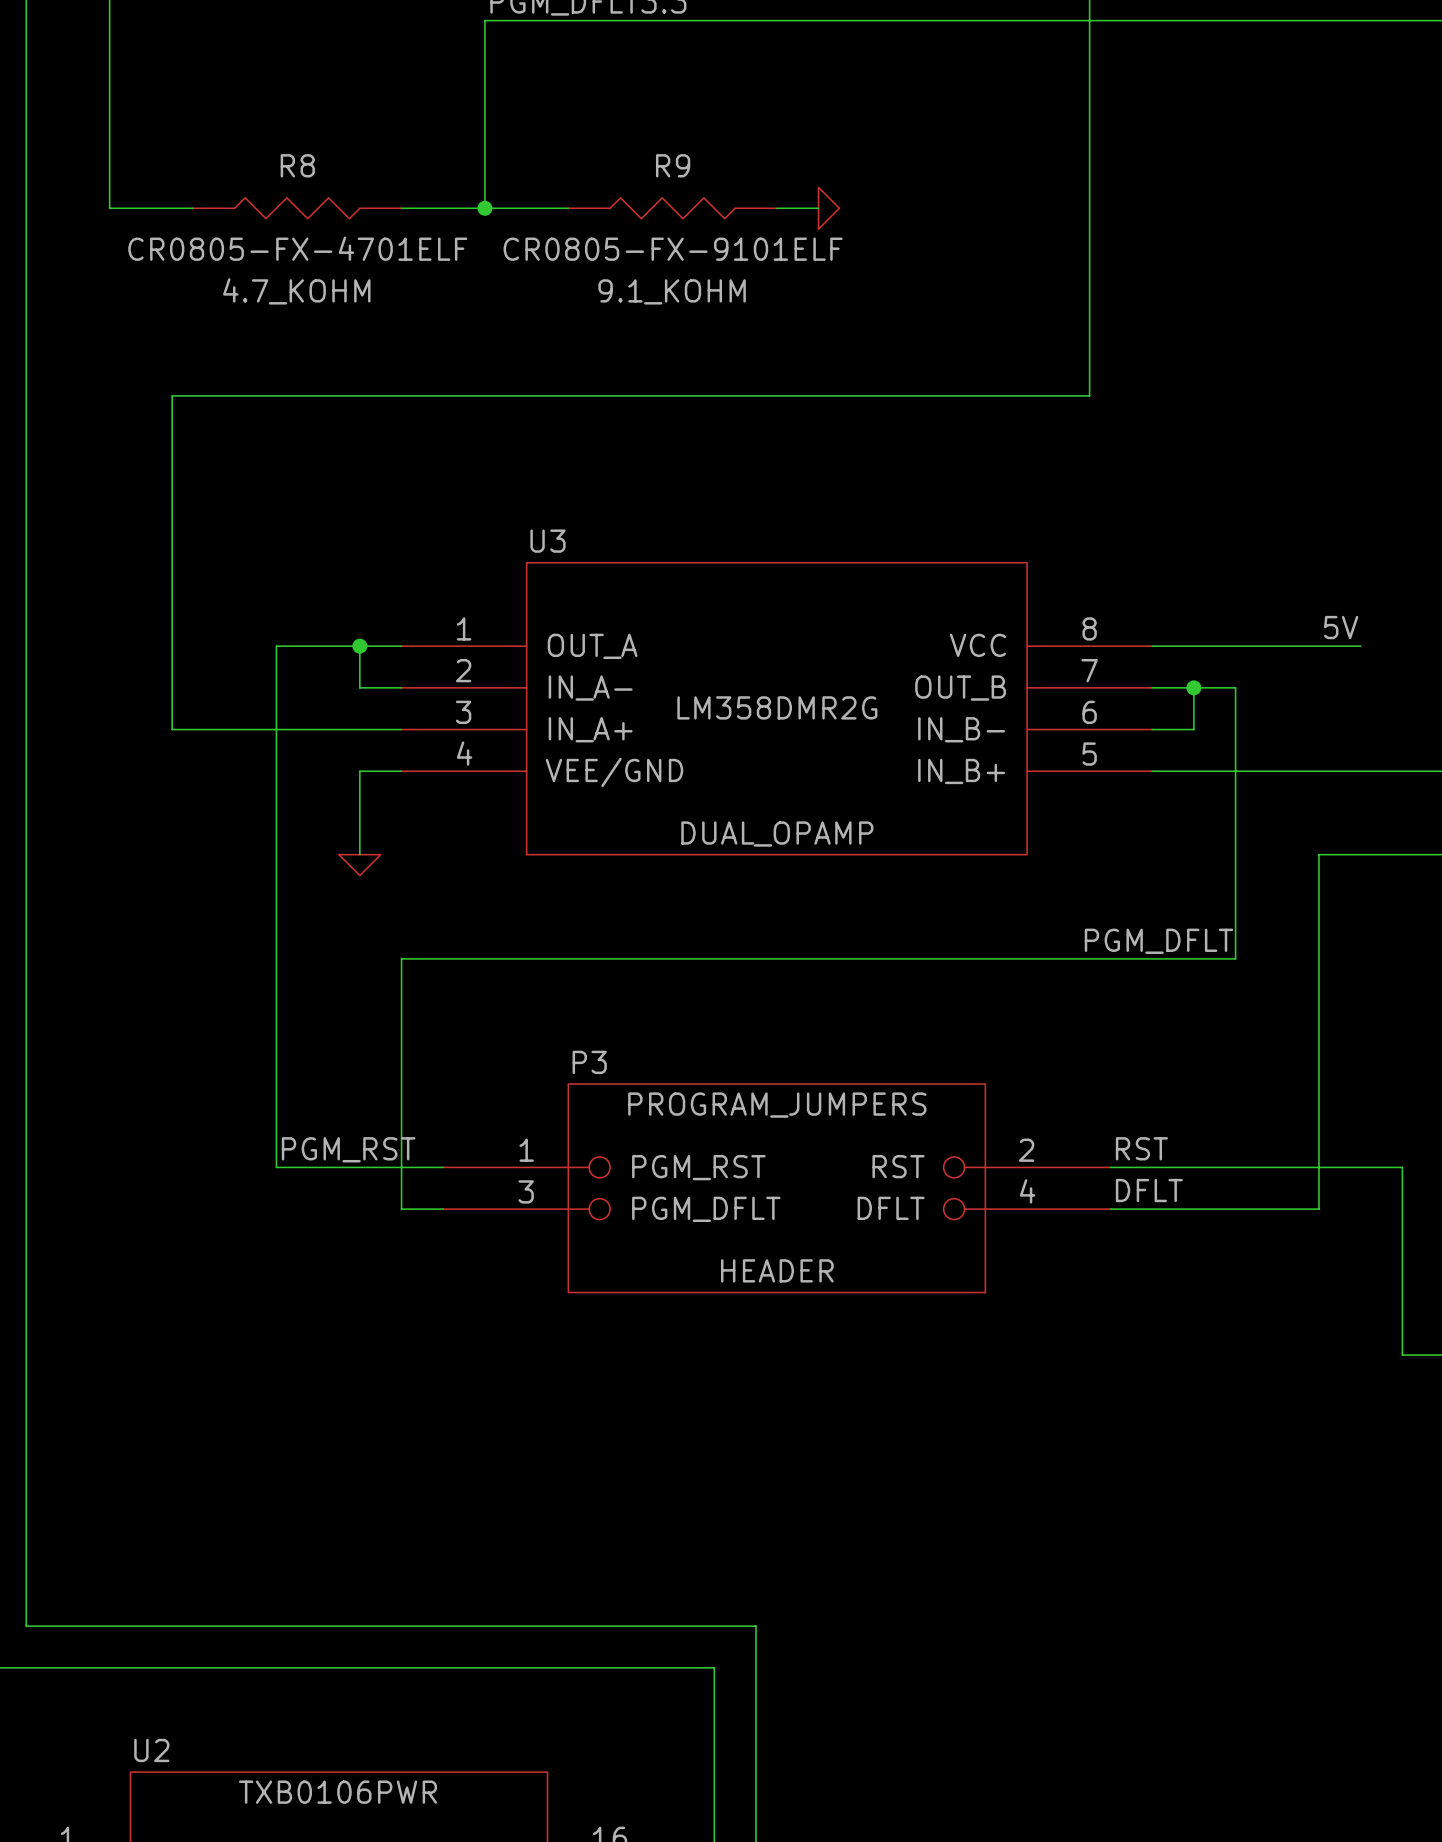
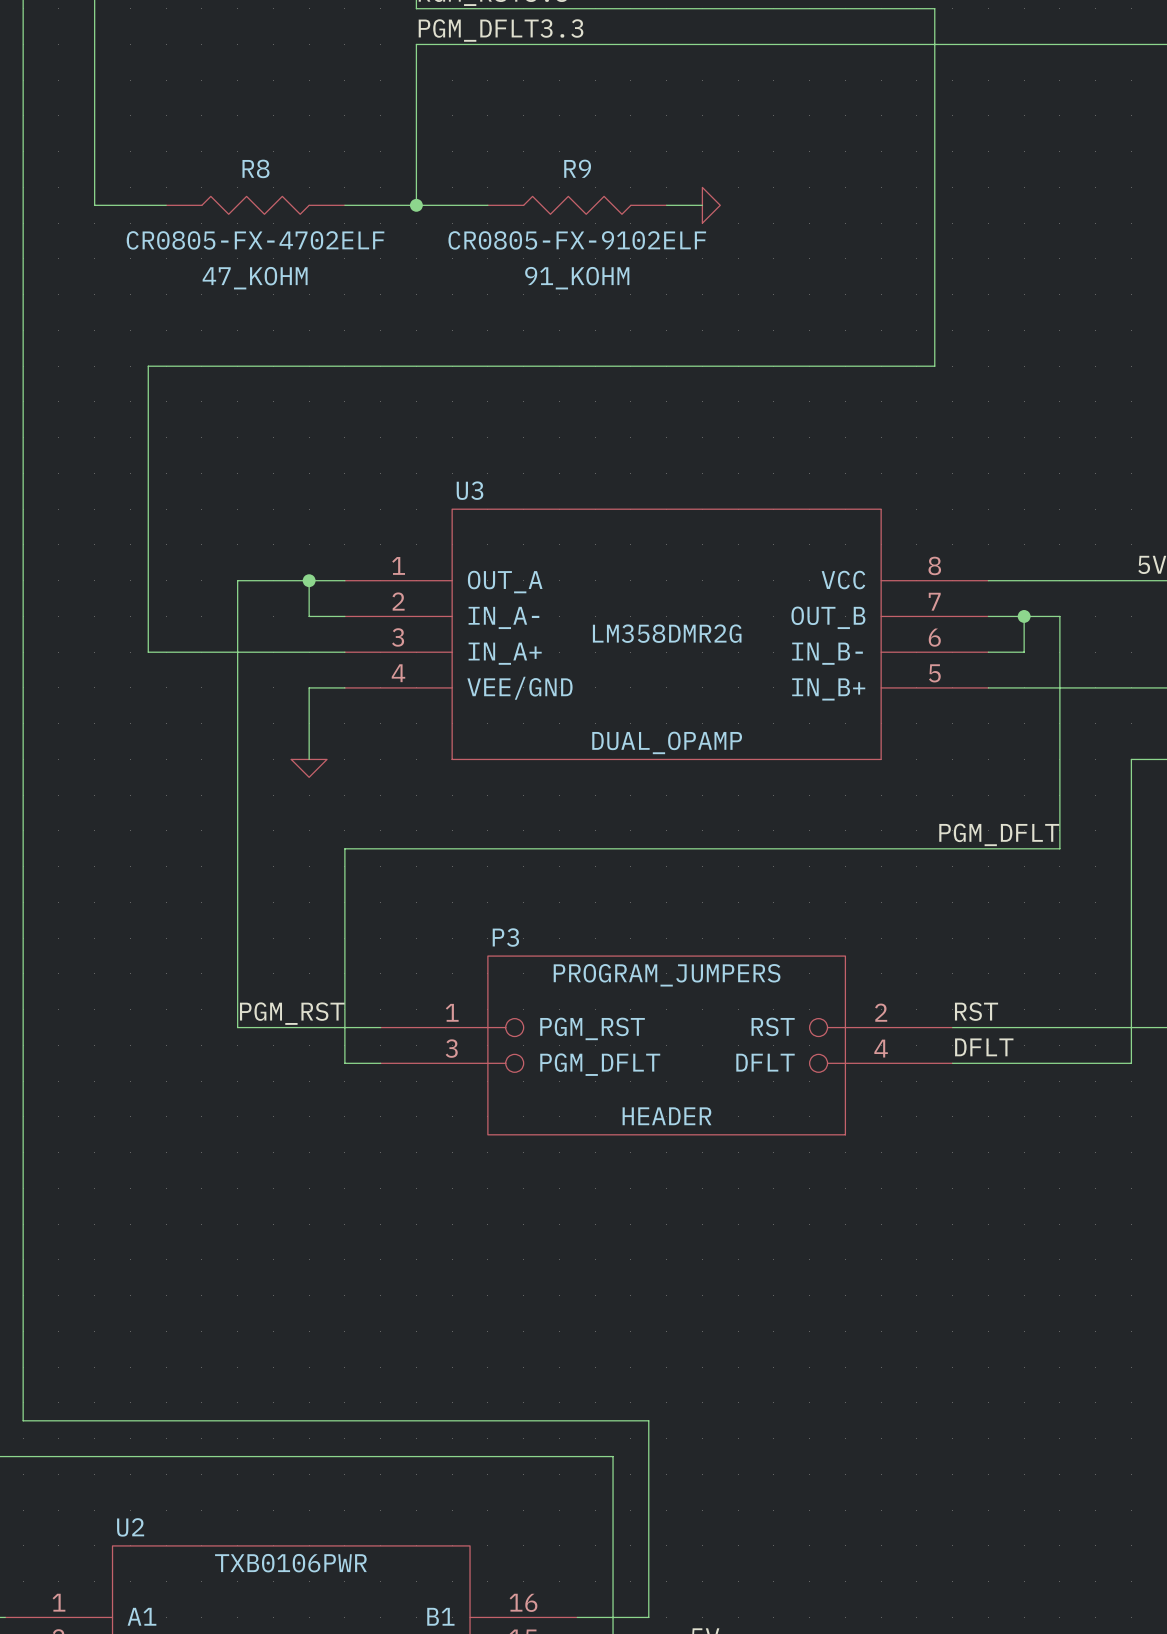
R8 value: CR0805-FX-4701ELF (297, 248) -> CR0805-FX-4702ELF (255, 240)
R9 value: CR0805-FX-9101ELF (673, 249) -> CR0805-FX-9102ELF (577, 240)
R8 text: 4.7_KOHM (296, 291) -> 47_KOHM (255, 278)
R9 text: 9.1_KOHM (672, 291) -> 91_KOHM (577, 278)

